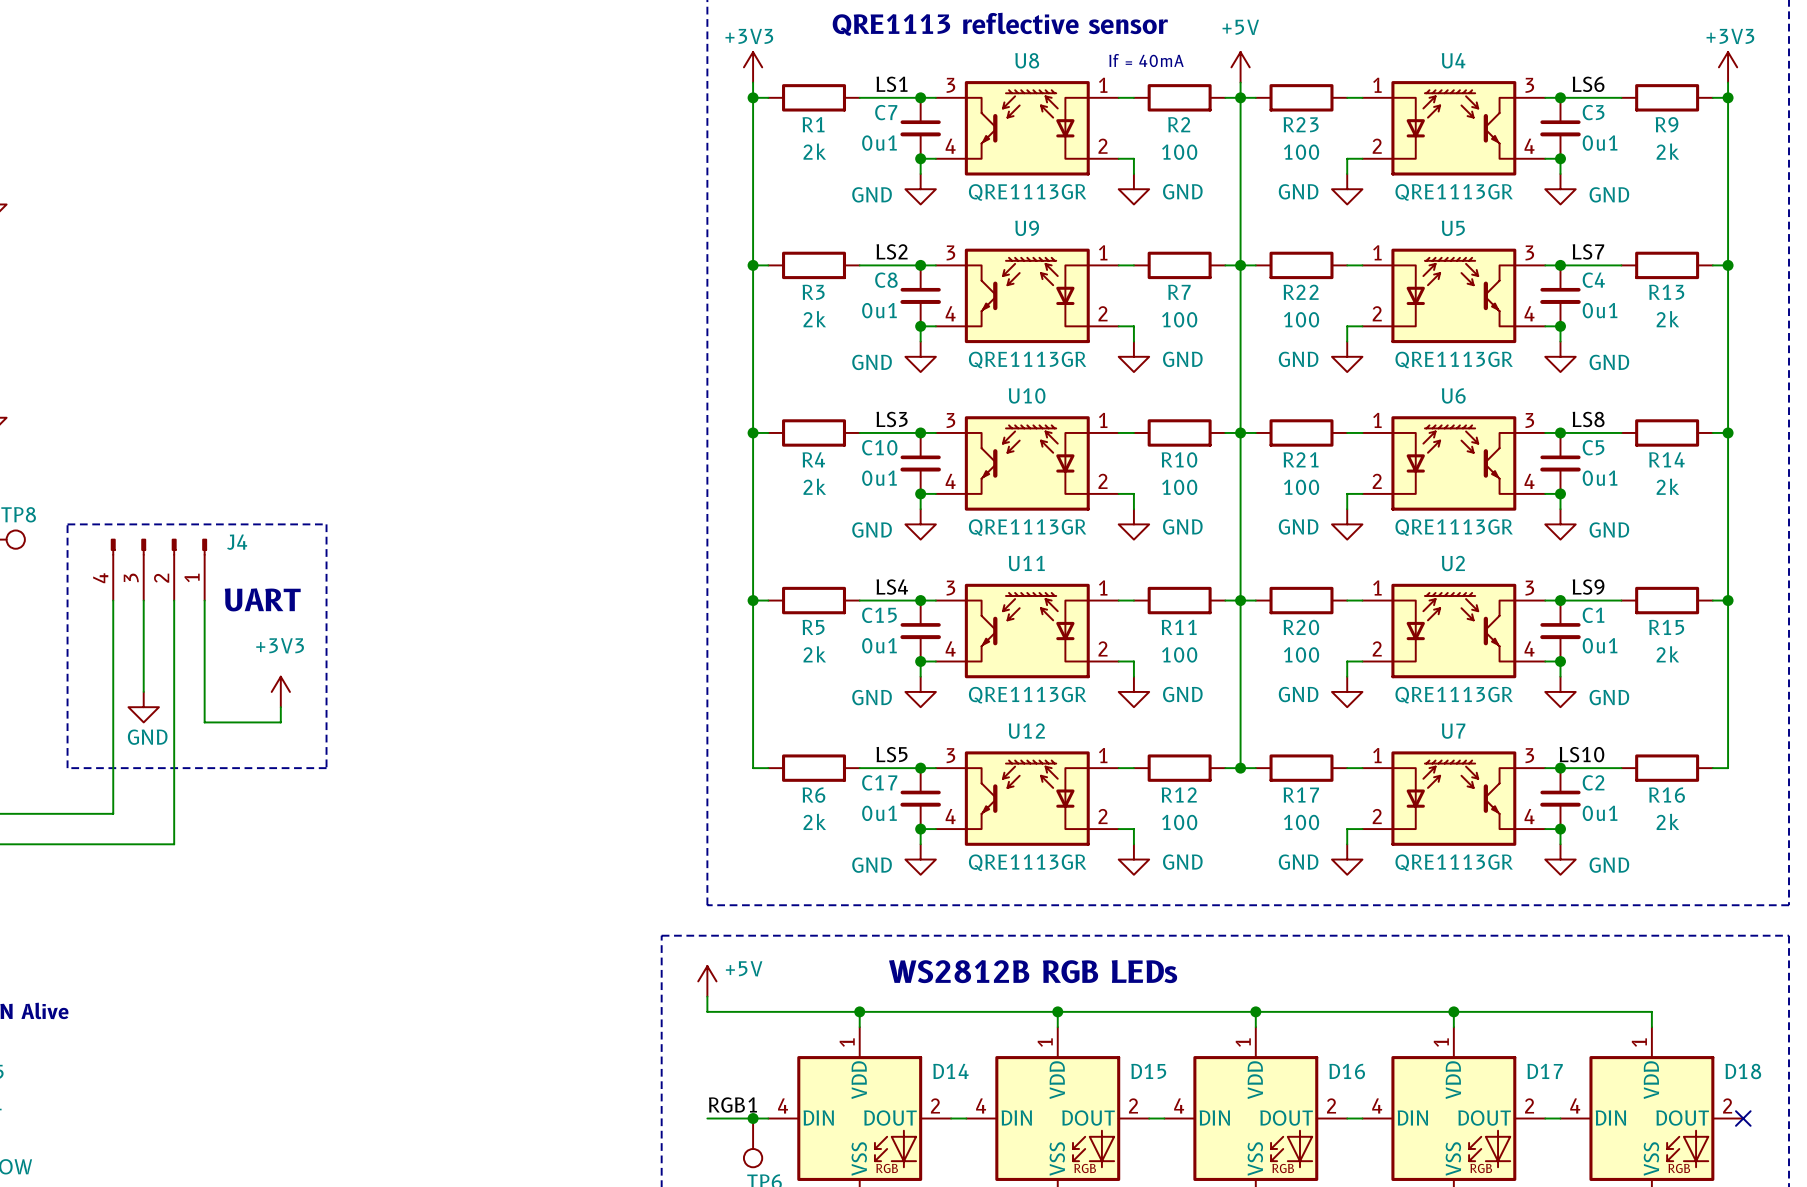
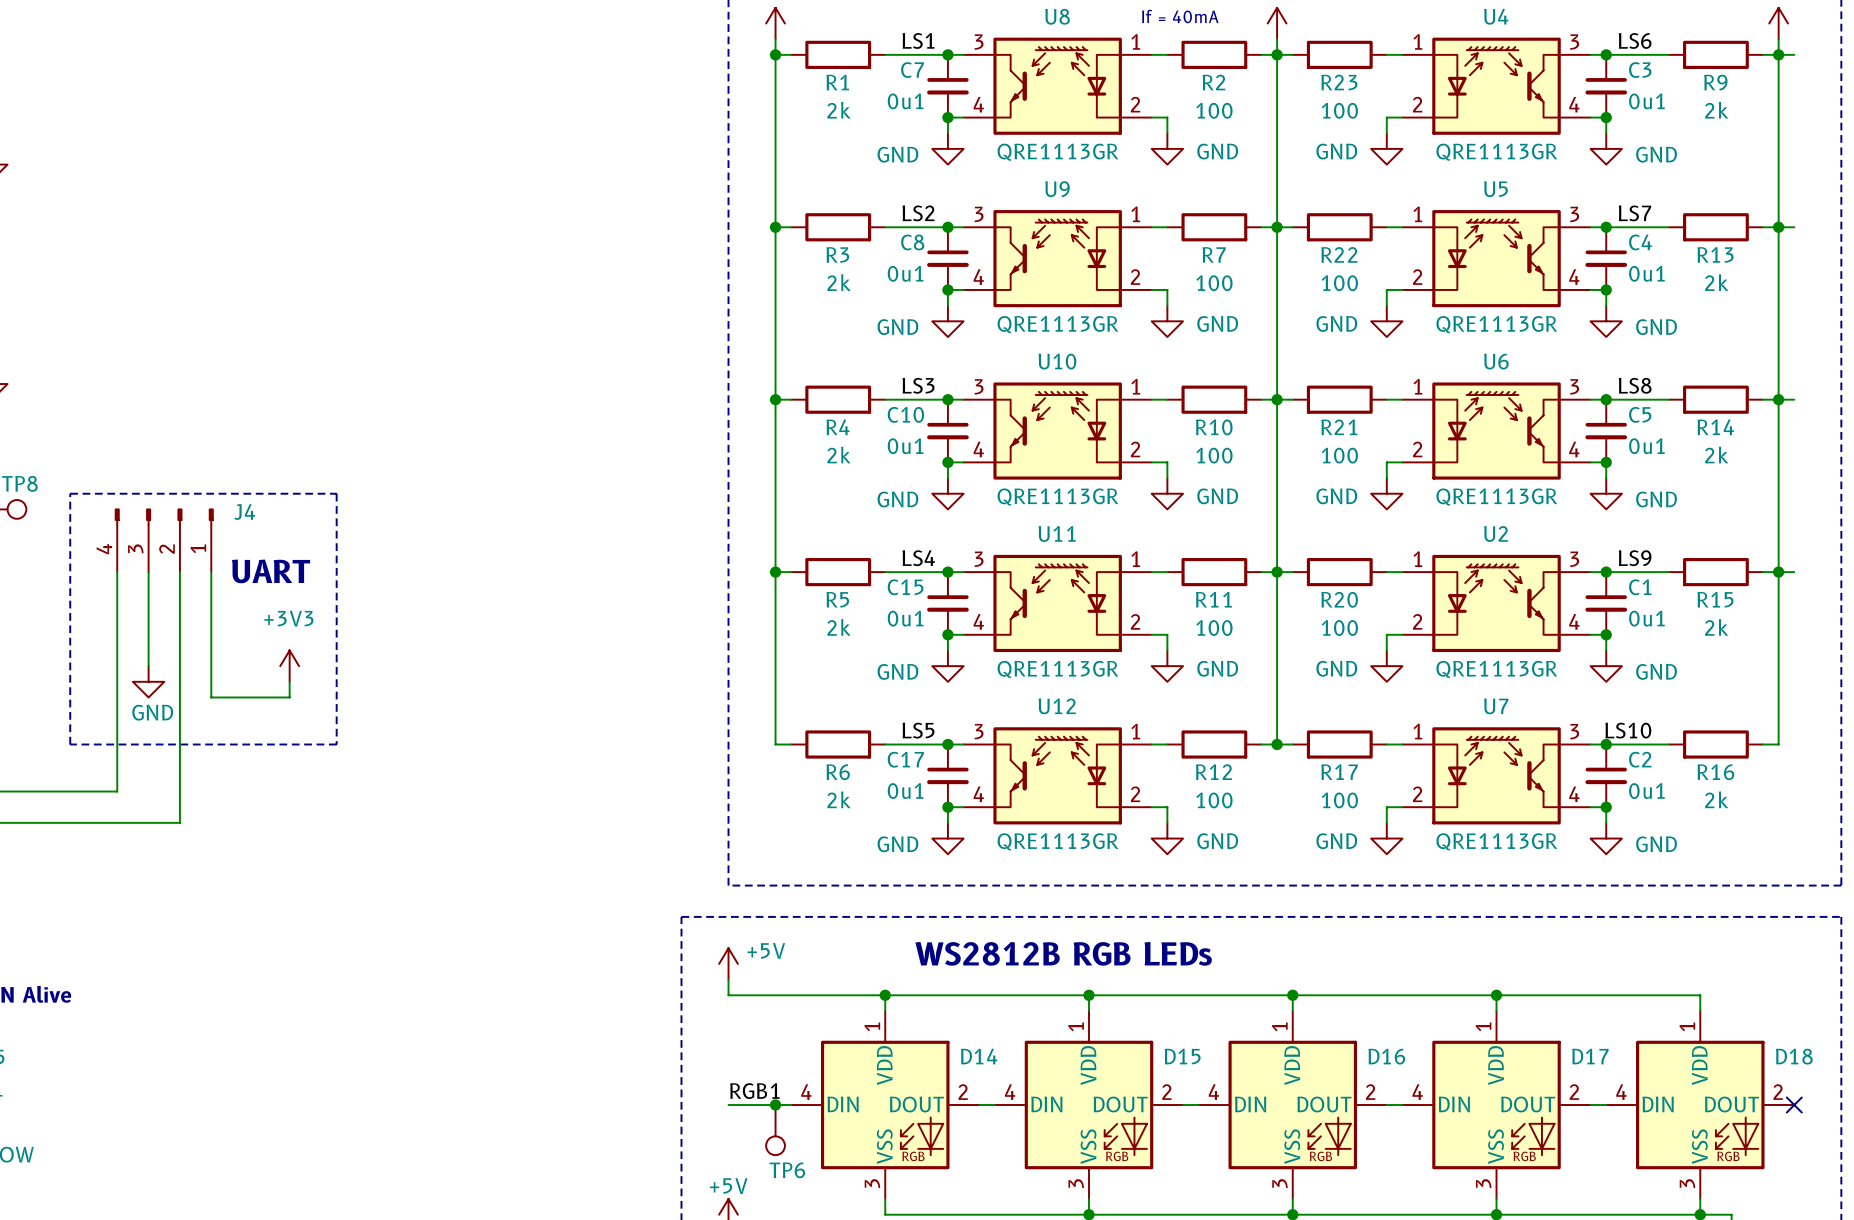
wire: none -> (1778, 54) (1794, 54)
wire: none -> (1778, 227) (1794, 227)
wire: none -> (1778, 399) (1794, 399)
wire: none -> (1778, 572) (1794, 572)

